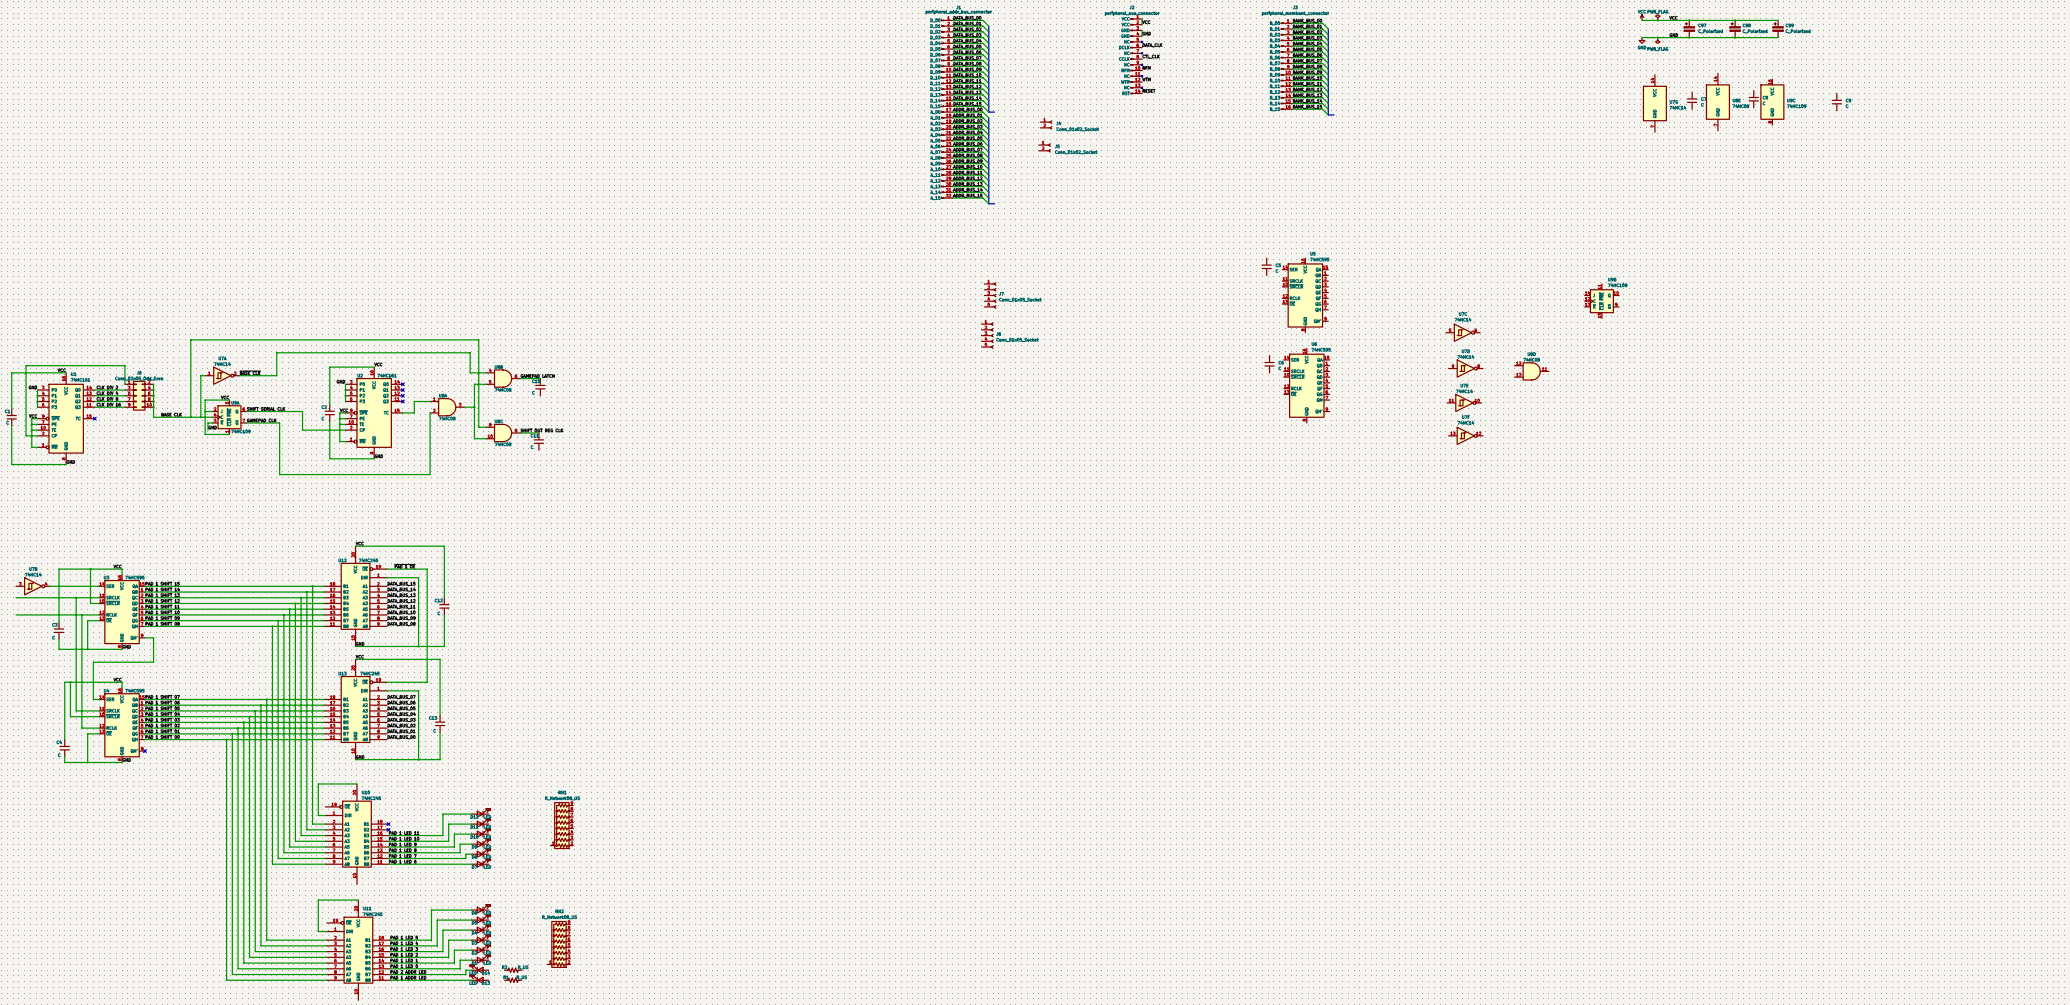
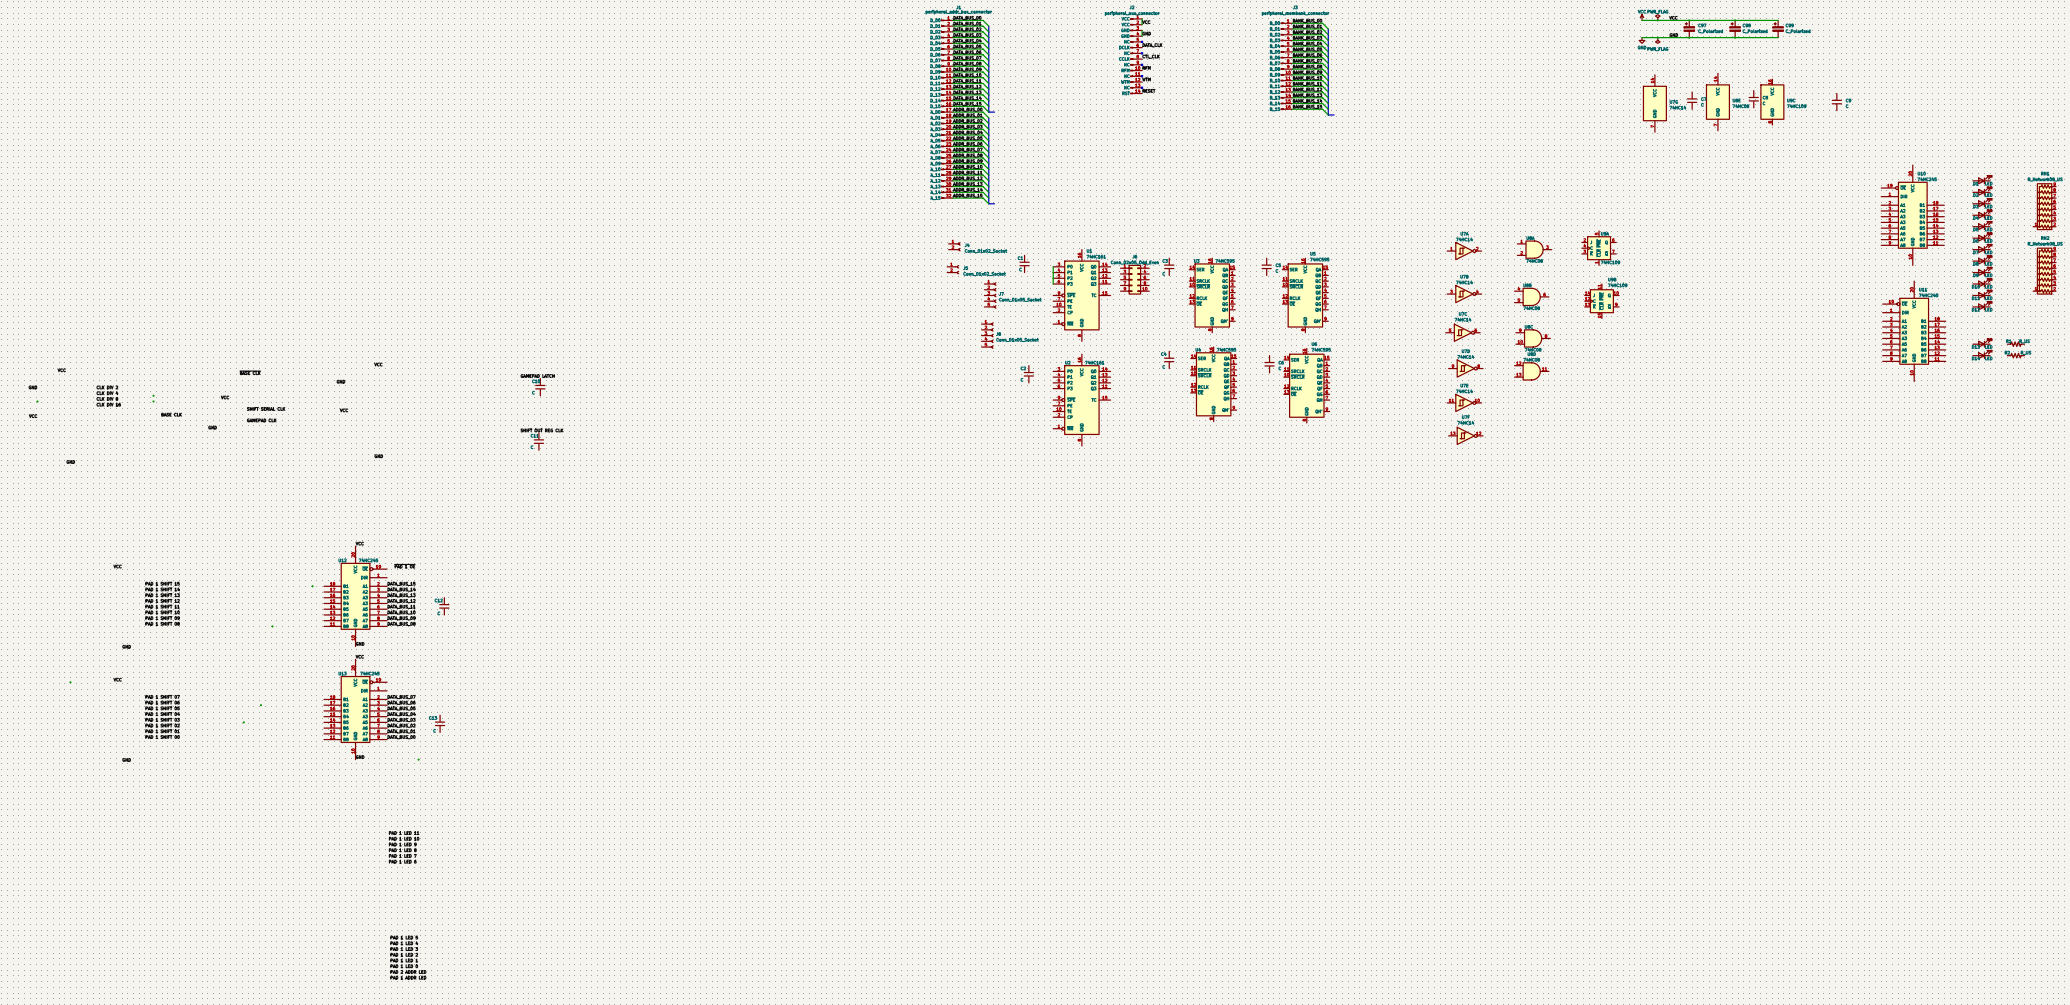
part position: (1046, 125) -> (954, 246)
part position: (1044, 147) -> (953, 269)
wire: none -> (1053, 266) (1053, 284)
wire: (374, 367) (329, 367) (329, 404) -> none
wire: (66, 372) (11, 372) (11, 408) -> none
wire: (485, 372) (470, 372) (470, 352) (276, 352) (276, 375) (239, 375) -> none
wire: (205, 375) (200, 375) (200, 417) -> none
part position: (222, 375) -> (1464, 251)
part position: (503, 378) -> (1531, 296)
wire: (520, 378) (540, 378) -> none
wire: (124, 384) (124, 365) (26, 365) (26, 435) (37, 435) -> none
wire: (153, 384) (153, 417) (212, 417) -> none
wire: (345, 384) (345, 401) -> none
no-connect mark: (402, 384) -> none
wire: (485, 384) (474, 384) (474, 438) (485, 438) -> none
wire: (37, 390) (37, 407) -> none
wire: (94, 390) (124, 390) -> none
no-connect mark: (402, 390) -> none
wire: (94, 395) (124, 395) -> none
part position: (139, 395) -> (1134, 279)
no-connect mark: (402, 395) -> none
wire: (229, 400) (205, 400) (205, 434) (229, 434) -> none
wire: (94, 401) (124, 401) -> none
no-connect mark: (402, 401) -> none
wire: (430, 401) (414, 401) (414, 412) (402, 412) -> none
wire: (94, 407) (124, 407) -> none
part position: (447, 407) -> (1534, 249)
wire: (464, 407) (474, 407) -> none
wire: (205, 411) (212, 411) -> none
wire: (246, 411) (302, 411) (302, 430) (345, 430) -> none
part position: (329, 412) -> (1028, 374)
wire: (345, 412) (339, 412) (339, 441) (345, 441) -> none
part position: (374, 412) -> (1081, 400)
wire: (430, 412) (430, 474) (279, 474) (279, 422) (246, 422) -> none
part position: (11, 417) -> (1024, 263)
wire: (190, 417) (190, 339) (478, 339) (478, 427) (485, 427) -> none
part position: (229, 417) -> (1599, 248)
wire: (37, 418) (31, 418) (31, 447) (37, 447) -> none
part position: (66, 418) -> (1081, 295)
no-connect mark: (94, 418) -> none
wire: (339, 418) (345, 418) -> none
wire: (329, 421) (329, 458) (374, 458) -> none
wire: (212, 422) (207, 422) (207, 430) -> none
wire: (31, 424) (37, 424) -> none
wire: (339, 424) (345, 424) -> none
wire: (11, 425) (11, 464) (66, 464) -> none
wire: (31, 430) (37, 430) -> none
part position: (503, 433) -> (1533, 338)
wire: (520, 433) (538, 433) -> none
wire: (355, 546) (444, 546) (444, 597) -> none
wire: (90, 569) (90, 603) (99, 603) -> none
wire: (387, 569) (427, 569) (427, 682) (387, 682) -> none
wire: (122, 574) (122, 569) (59, 569) (59, 622) -> none
wire: (387, 577) (418, 577) (418, 646) -> none
part position: (33, 586) -> (1464, 294)
wire: (50, 586) (99, 586) -> none
wire: (144, 586) (324, 586) -> none
wire: (312, 586) (312, 824) (325, 824) -> none
wire: (144, 592) (324, 592) -> none
wire: (306, 592) (306, 829) (325, 829) -> none
wire: (16, 597) (99, 597) -> none
wire: (76, 597) (76, 710) (99, 710) -> none
wire: (144, 597) (324, 597) -> none
wire: (301, 597) (301, 835) (325, 835) -> none
wire: (144, 603) (324, 603) -> none
wire: (295, 603) (295, 841) (325, 841) -> none
wire: (144, 609) (324, 609) -> none
wire: (289, 609) (289, 847) (325, 847) -> none
part position: (122, 612) -> (1212, 295)
wire: (16, 614) (99, 614) -> none
wire: (81, 614) (81, 728) (99, 728) -> none
wire: (144, 614) (324, 614) -> none
wire: (283, 614) (283, 852) (325, 852) -> none
wire: (444, 614) (444, 646) (355, 646) -> none
wire: (99, 620) (87, 620) (87, 649) -> none
wire: (144, 620) (324, 620) -> none
wire: (278, 620) (278, 858) (325, 858) -> none
wire: (144, 626) (324, 626) -> none
wire: (272, 626) (272, 864) (325, 864) -> none
part position: (59, 630) -> (1169, 266)
wire: (144, 637) (153, 637) (153, 662) (93, 662) (93, 699) (99, 699) -> none
wire: (59, 639) (59, 649) (122, 649) -> none
wire: (355, 659) (440, 659) (440, 715) -> none
wire: (70, 682) (70, 716) (99, 716) -> none
wire: (122, 688) (122, 682) (64, 682) (64, 739) -> none
wire: (387, 690) (418, 690) (418, 759) -> none
wire: (144, 699) (324, 699) -> none
wire: (266, 699) (266, 940) (326, 940) -> none
wire: (144, 705) (324, 705) -> none
wire: (260, 705) (260, 945) (326, 945) -> none
wire: (144, 710) (324, 710) -> none
wire: (255, 710) (255, 951) (326, 951) -> none
wire: (144, 716) (324, 716) -> none
wire: (249, 716) (249, 957) (326, 957) -> none
wire: (144, 722) (324, 722) -> none
wire: (243, 722) (243, 963) (326, 963) -> none
part position: (122, 725) -> (1213, 384)
wire: (144, 728) (324, 728) -> none
wire: (238, 728) (238, 968) (326, 968) -> none
wire: (440, 732) (440, 759) (355, 759) -> none
wire: (99, 733) (87, 733) (87, 762) -> none
wire: (144, 733) (324, 733) -> none
wire: (232, 733) (232, 974) (326, 974) -> none
wire: (144, 739) (324, 739) -> none
wire: (226, 739) (226, 980) (326, 980) -> none
part position: (64, 748) -> (1169, 359)
no-connect mark: (144, 751) -> none
wire: (64, 756) (64, 762) (122, 762) -> none
wire: (356, 783) (318, 783) (318, 815) (325, 815) -> none
part position: (481, 813) -> (1982, 305)
wire: (471, 814) (442, 814) (442, 835) (388, 835) -> none
part position: (481, 823) -> (1982, 294)
no-connect mark: (388, 824) -> none
wire: (471, 824) (448, 824) (448, 841) (388, 841) -> none
part position: (561, 825) -> (2044, 206)
no-connect mark: (388, 829) -> none
part position: (481, 833) -> (1982, 283)
part position: (356, 834) -> (1912, 215)
wire: (471, 834) (454, 834) (454, 847) (388, 847) -> none
part position: (481, 843) -> (1982, 271)
wire: (471, 844) (460, 844) (460, 852) (388, 852) -> none
part position: (481, 853) -> (1982, 260)
wire: (471, 854) (465, 854) (465, 858) (388, 858) -> none
part position: (481, 863) -> (1982, 248)
wire: (388, 864) (471, 864) -> none
wire: (358, 900) (318, 900) (318, 931) (326, 931) -> none
part position: (481, 909) -> (1982, 237)
wire: (471, 910) (431, 910) (431, 940) (389, 940) -> none
part position: (481, 919) -> (1982, 225)
wire: (471, 920) (437, 920) (437, 945) (389, 945) -> none
part position: (481, 929) -> (1982, 214)
wire: (471, 930) (442, 930) (442, 951) (389, 951) -> none
part position: (481, 939) -> (1982, 202)
wire: (471, 940) (448, 940) (448, 957) (389, 957) -> none
part position: (558, 944) -> (2044, 271)
part position: (481, 949) -> (1982, 191)
part position: (358, 950) -> (1914, 331)
wire: (471, 950) (454, 950) (454, 963) (389, 963) -> none
part position: (481, 959) -> (1982, 179)
wire: (471, 960) (460, 960) (460, 968) (389, 968) -> none
part flip: as is (476, 969) -> left-right (1985, 354)
part position: (479, 969) -> (1982, 354)
wire: (471, 970) (465, 970) (465, 974) (389, 974) -> none
part position: (513, 970) -> (2015, 355)
part flip: as is (476, 979) -> left-right (1985, 343)
part position: (479, 979) -> (1982, 343)
wire: (389, 980) (471, 980) -> none
part position: (513, 980) -> (2015, 344)

